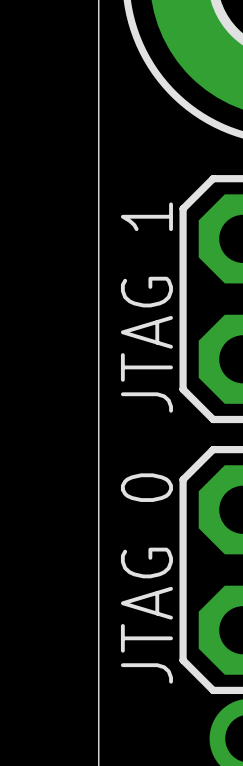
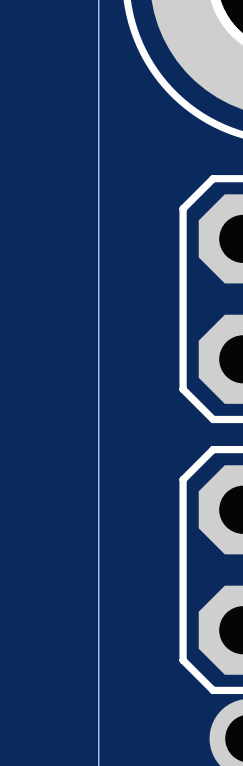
text: JTAG 1 (146, 307) -> none
text: JTAG 0 (146, 578) -> none

